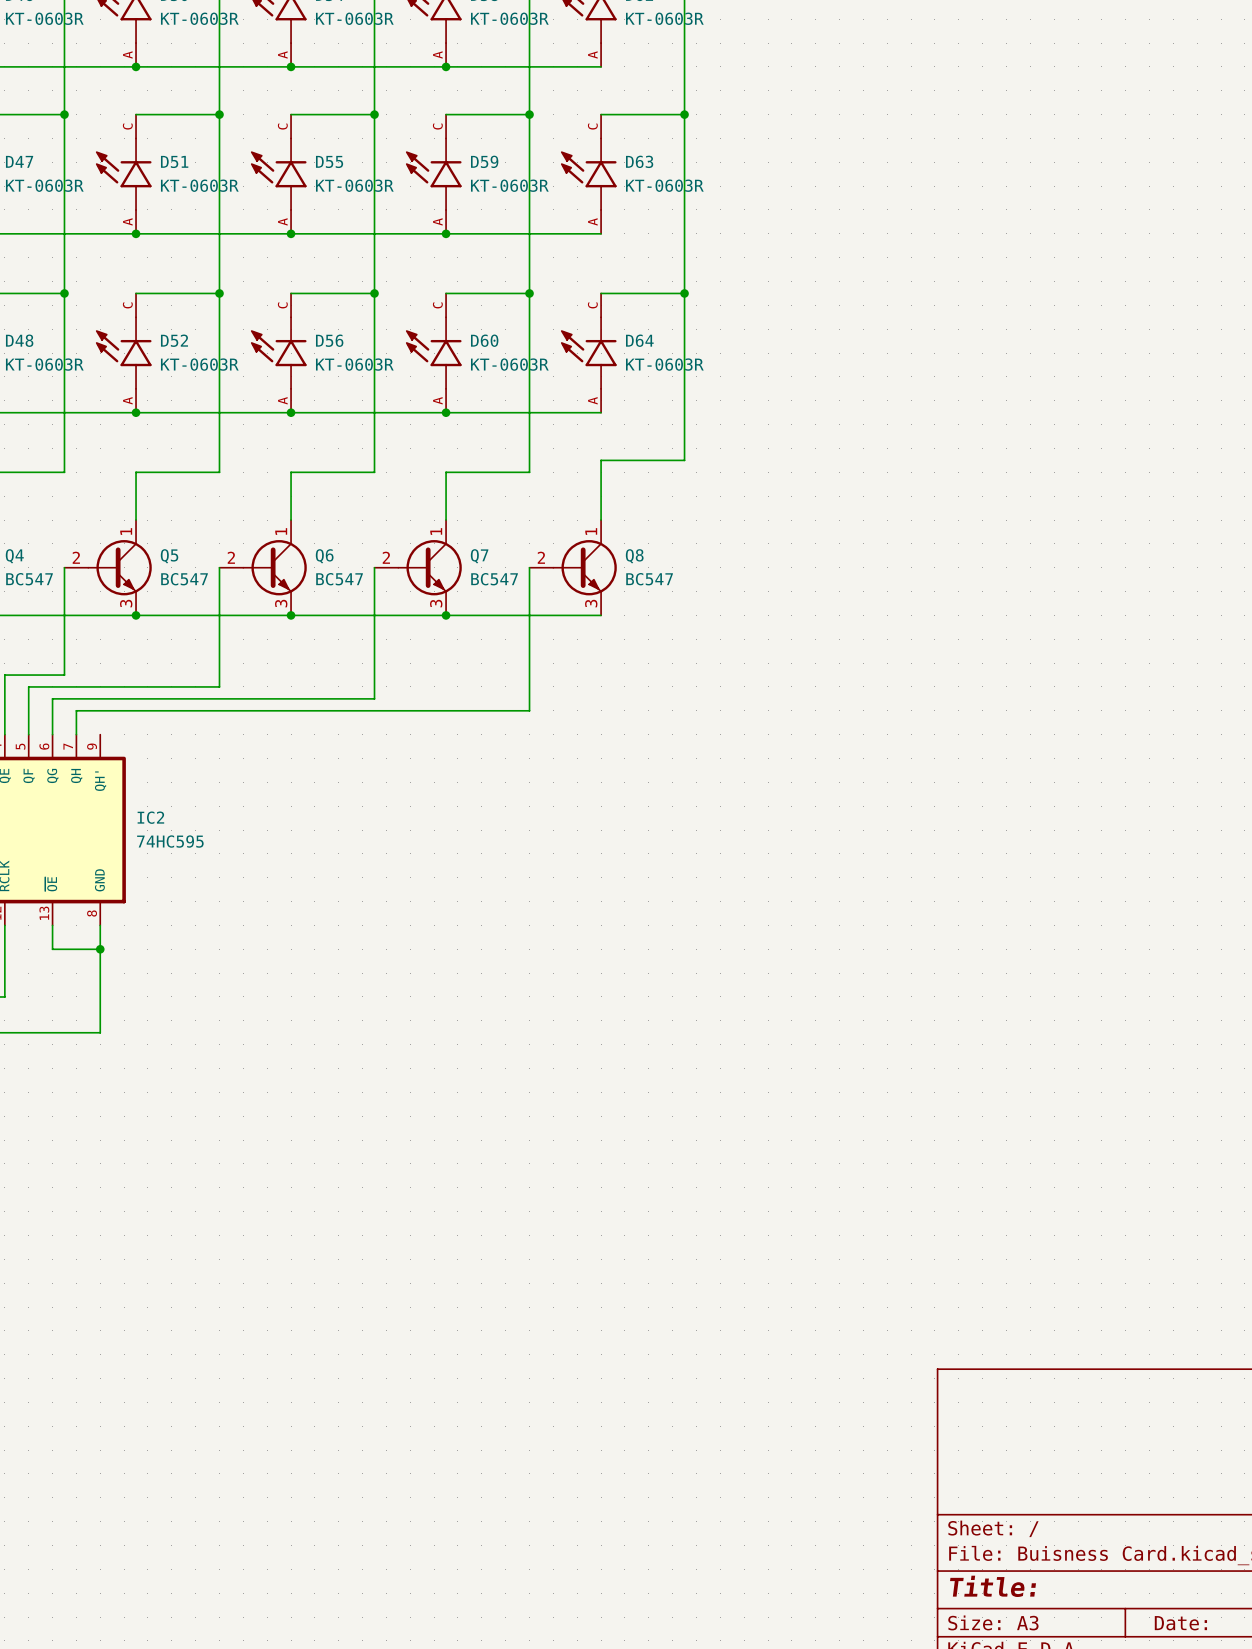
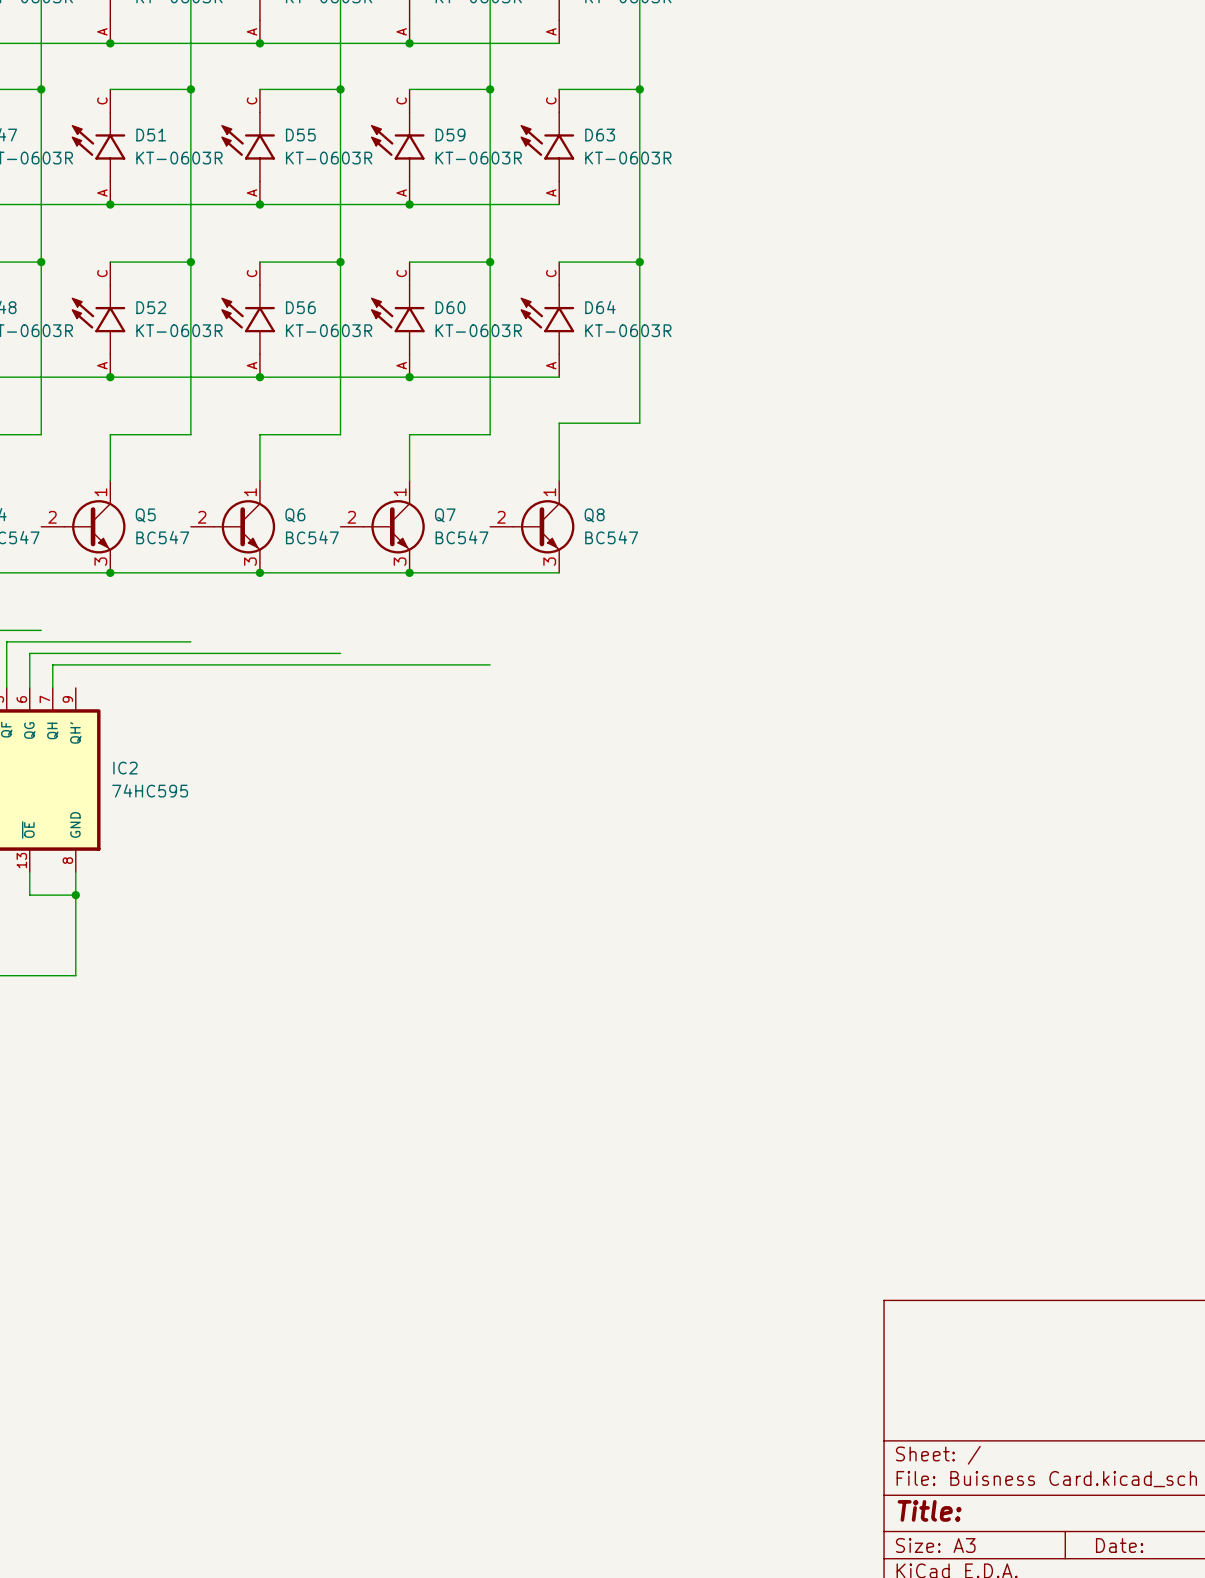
wire: (64, 567) (64, 675) -> none
wire: (219, 567) (219, 686) -> none
wire: (374, 567) (374, 698) -> none
wire: (529, 567) (529, 710) -> none

